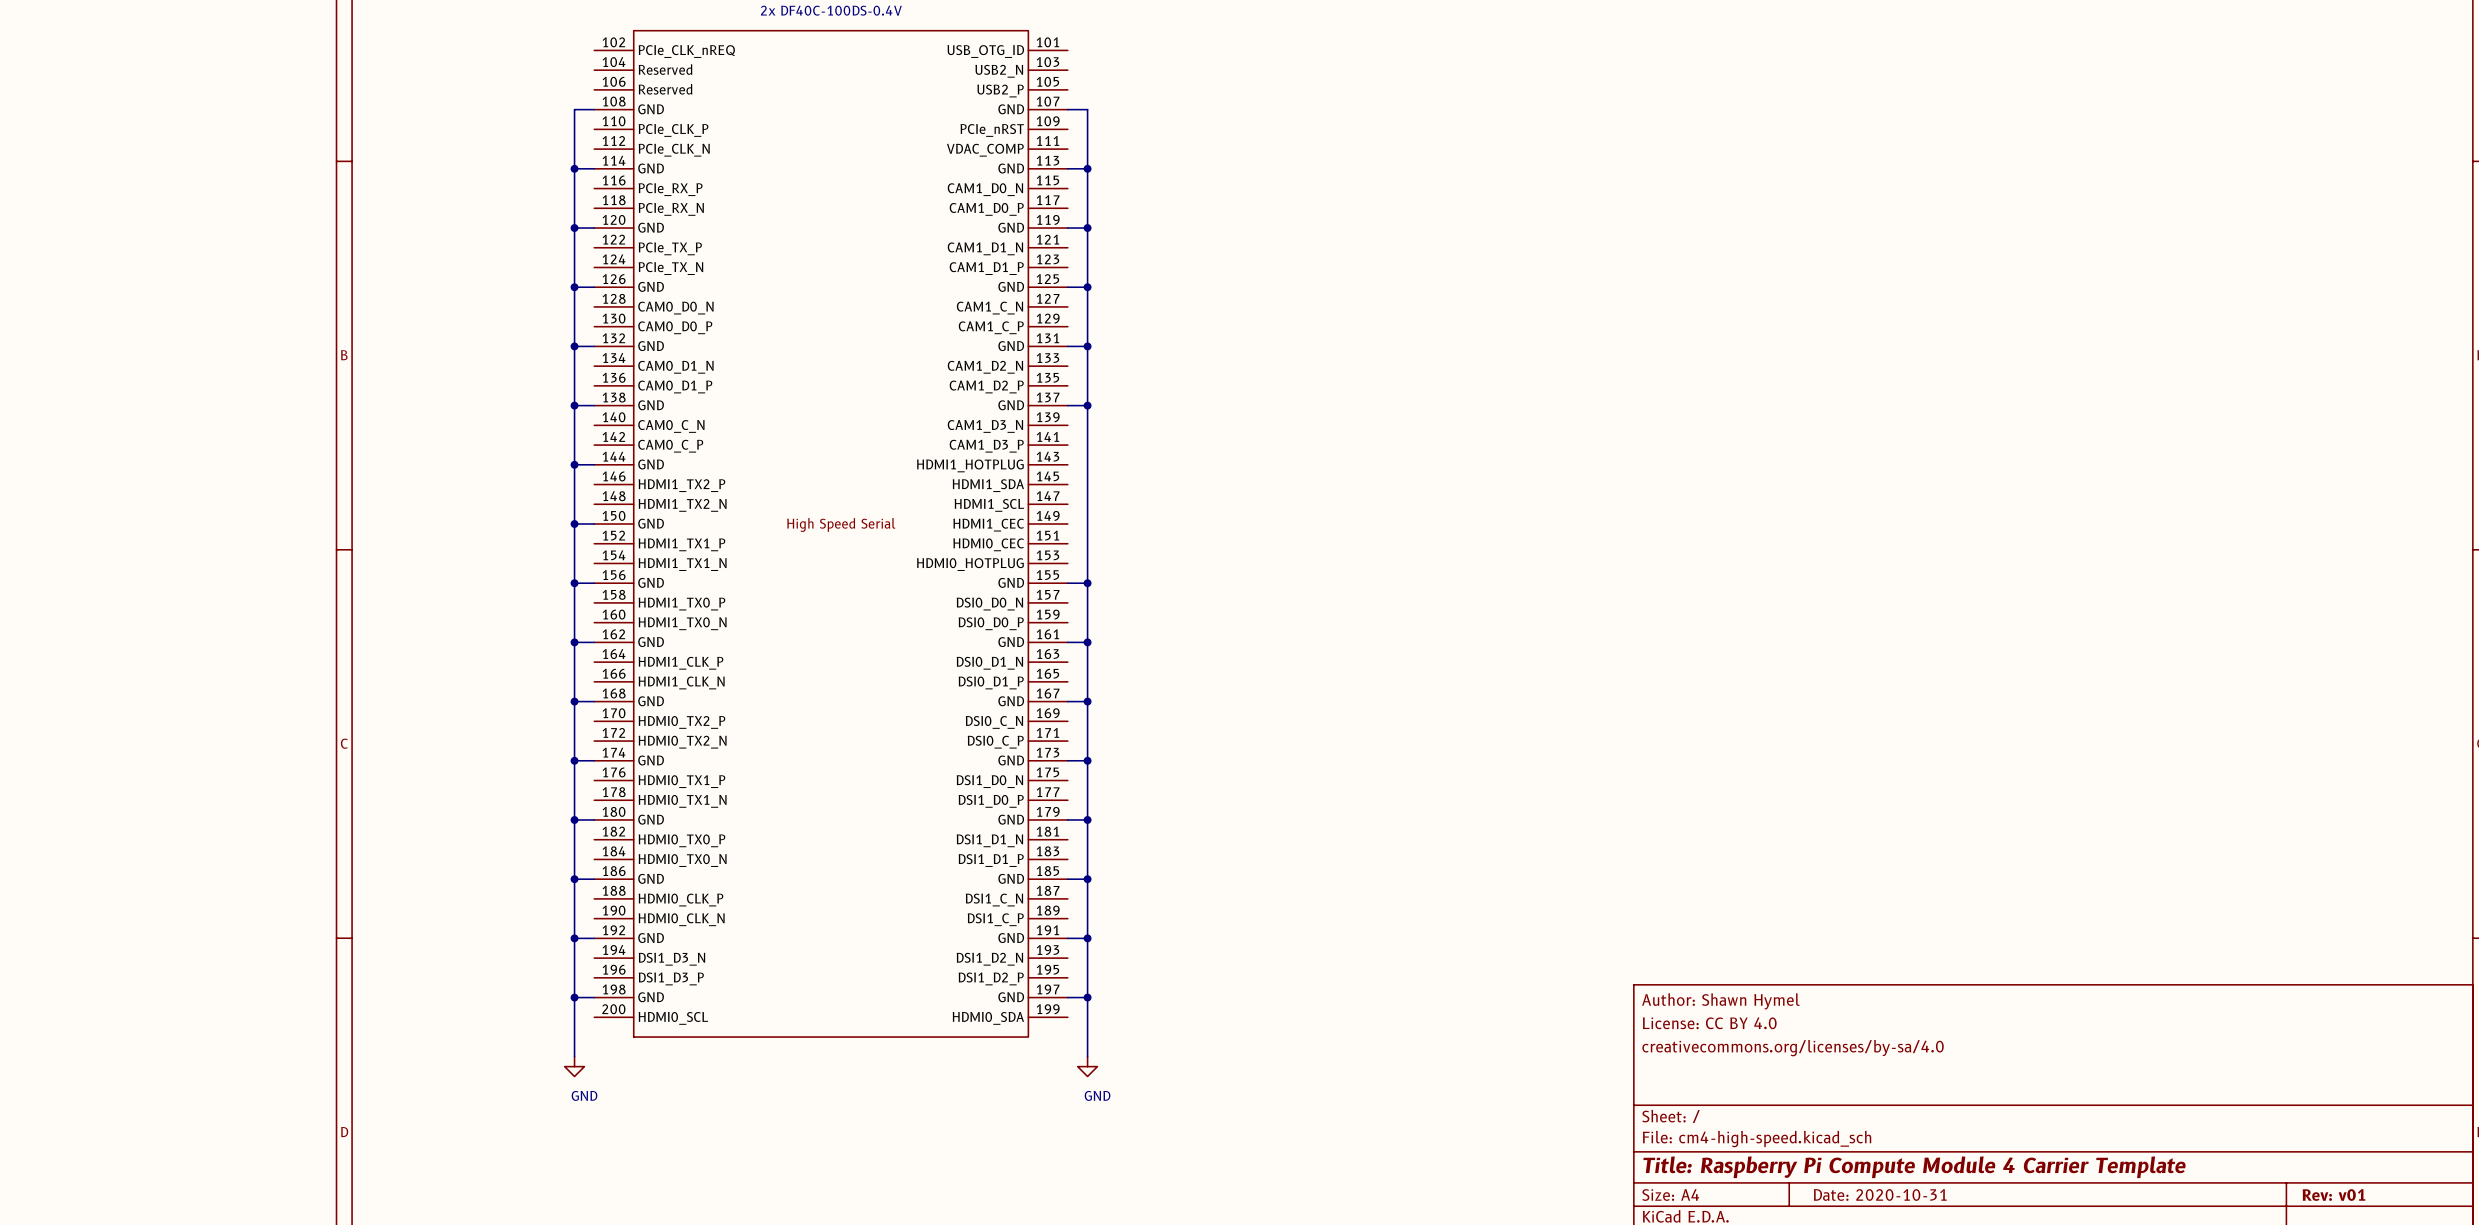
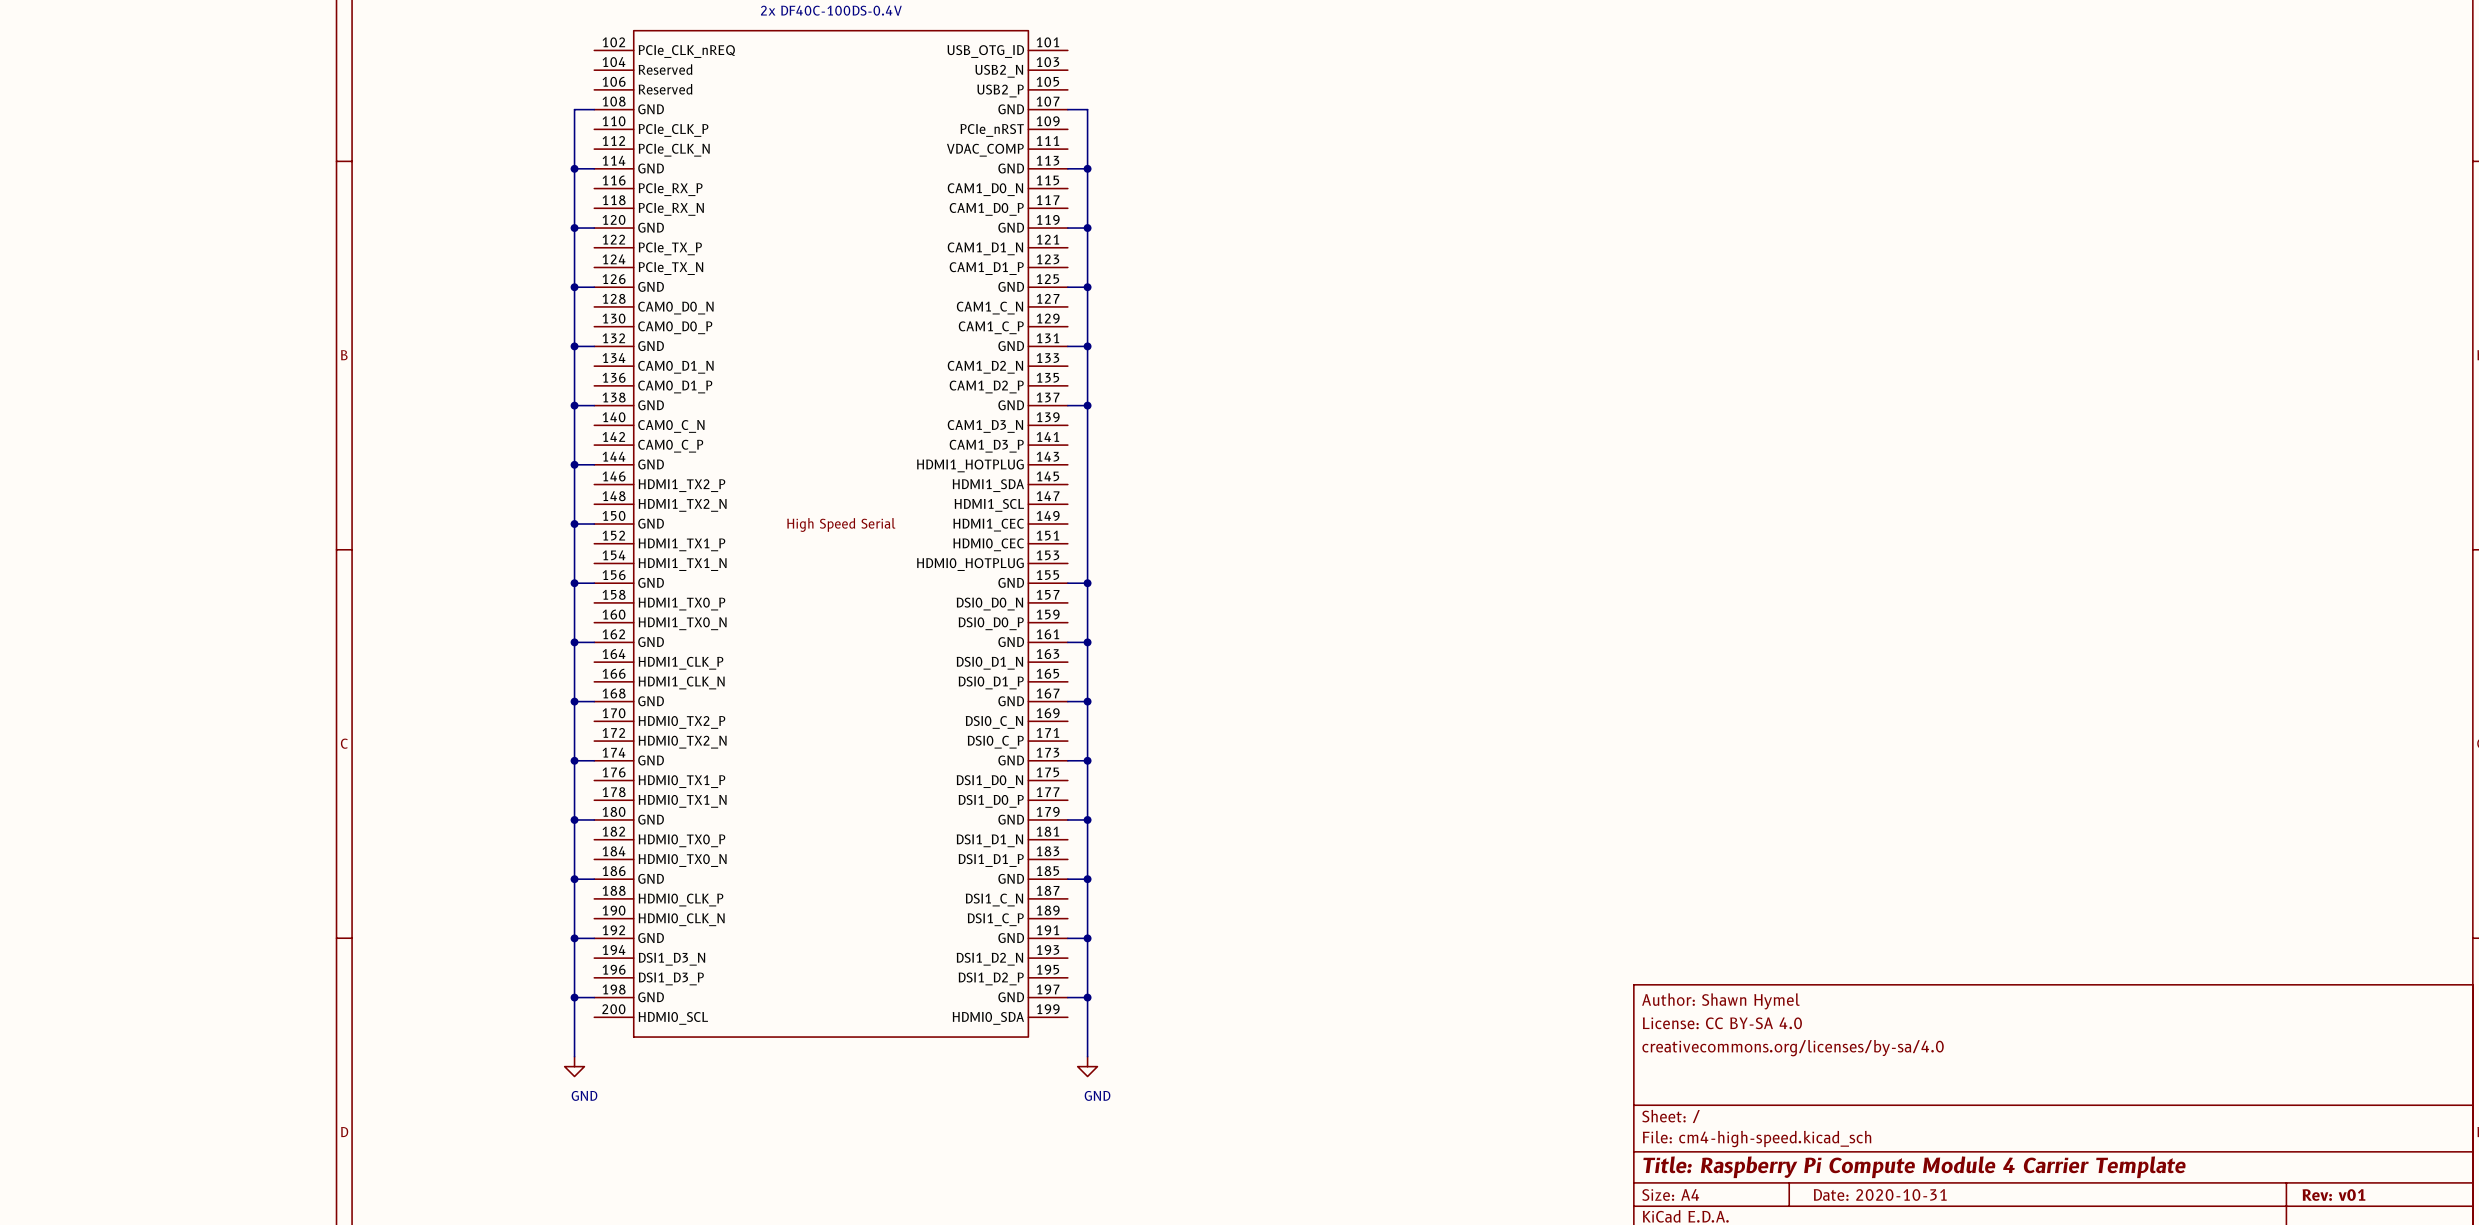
title block: License: CC BY 4.0 (1709, 1023) -> License: CC BY-SA 4.0 (1722, 1023)

